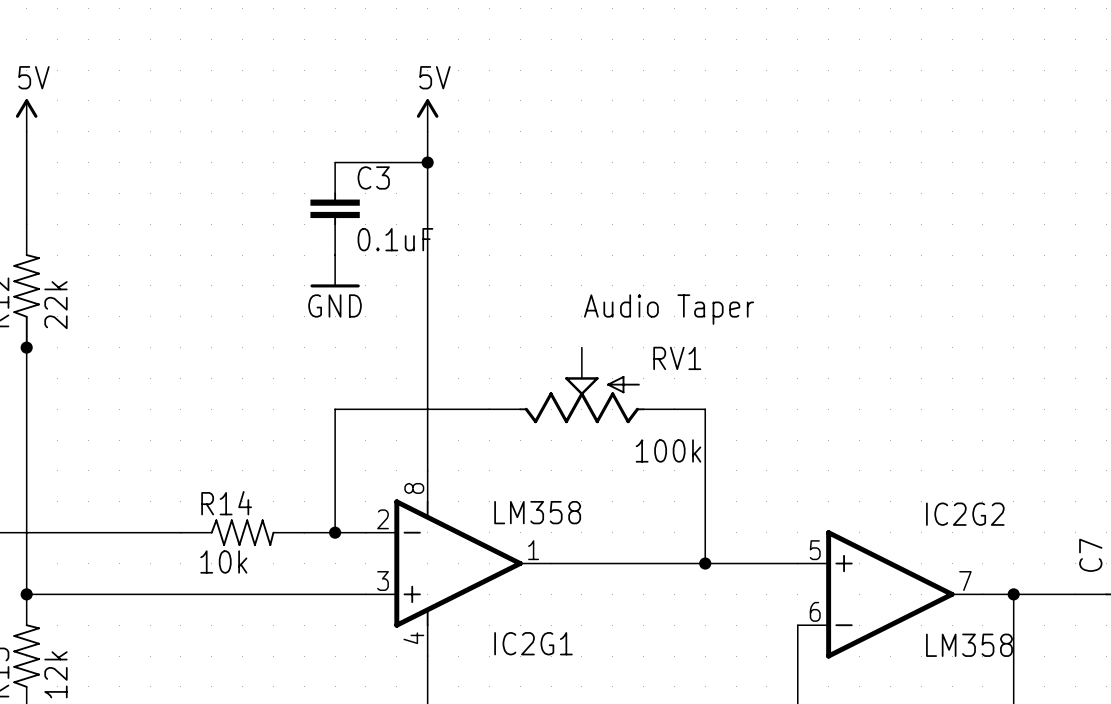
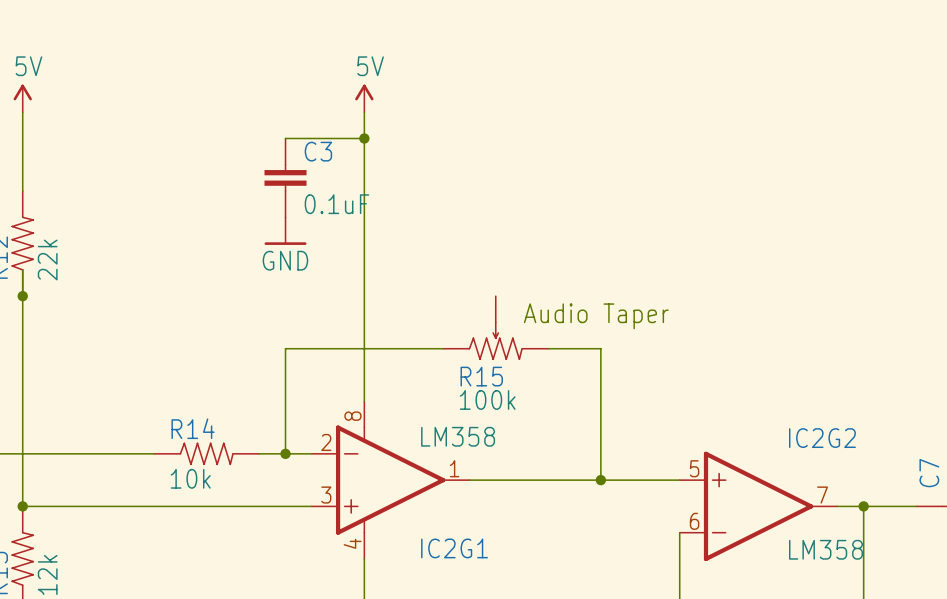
text position: Audio Taper (669, 309) -> Audio Taper (596, 316)
RV1: 100k (581, 385) -> none
R15: none -> 100k (495, 328)

